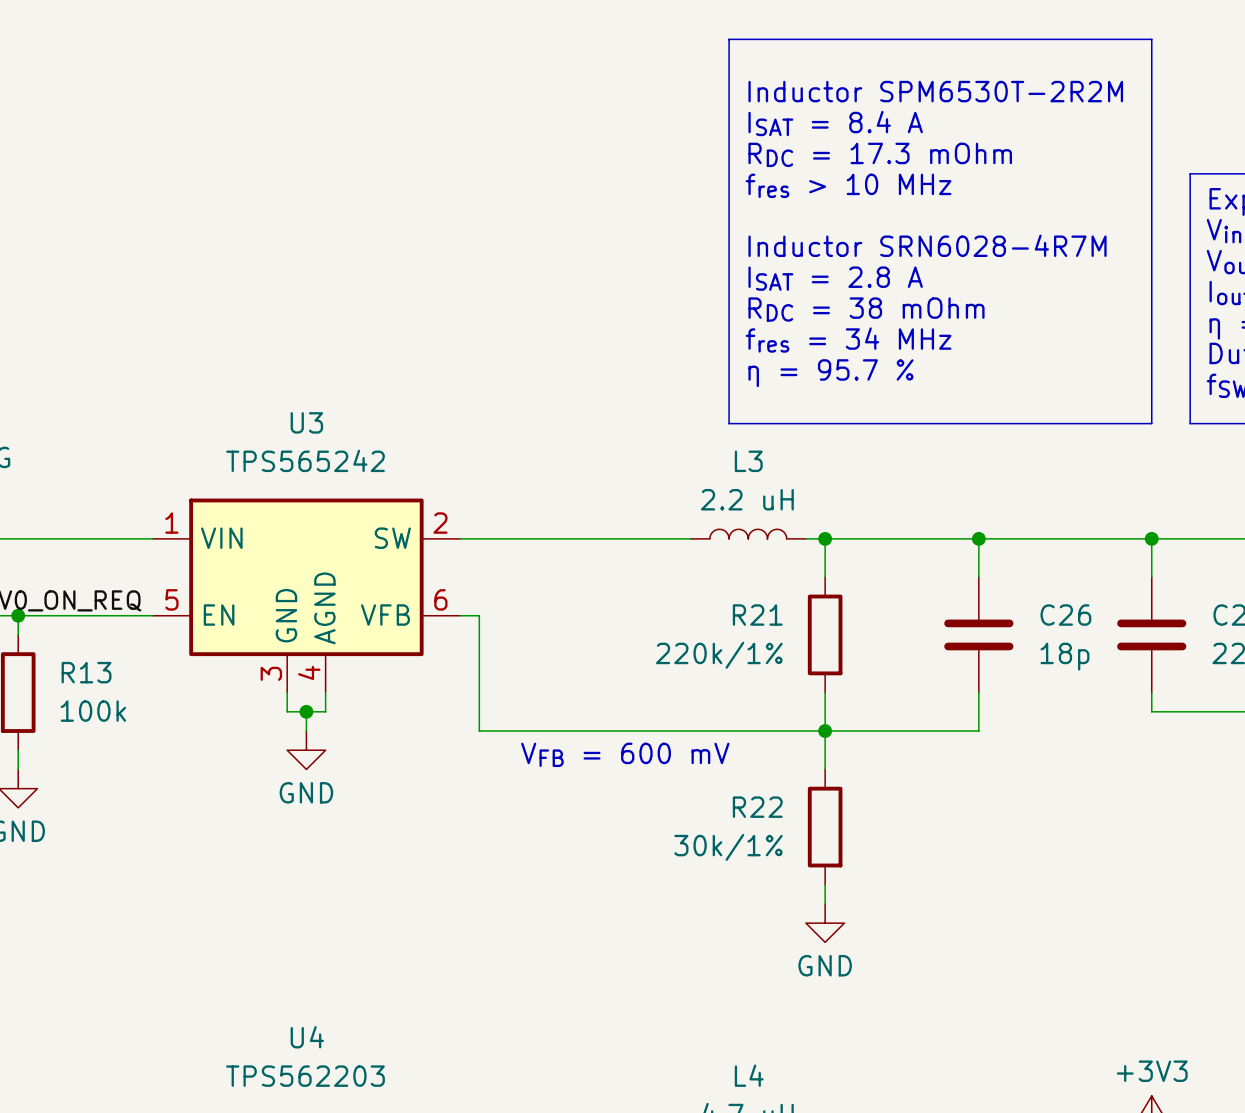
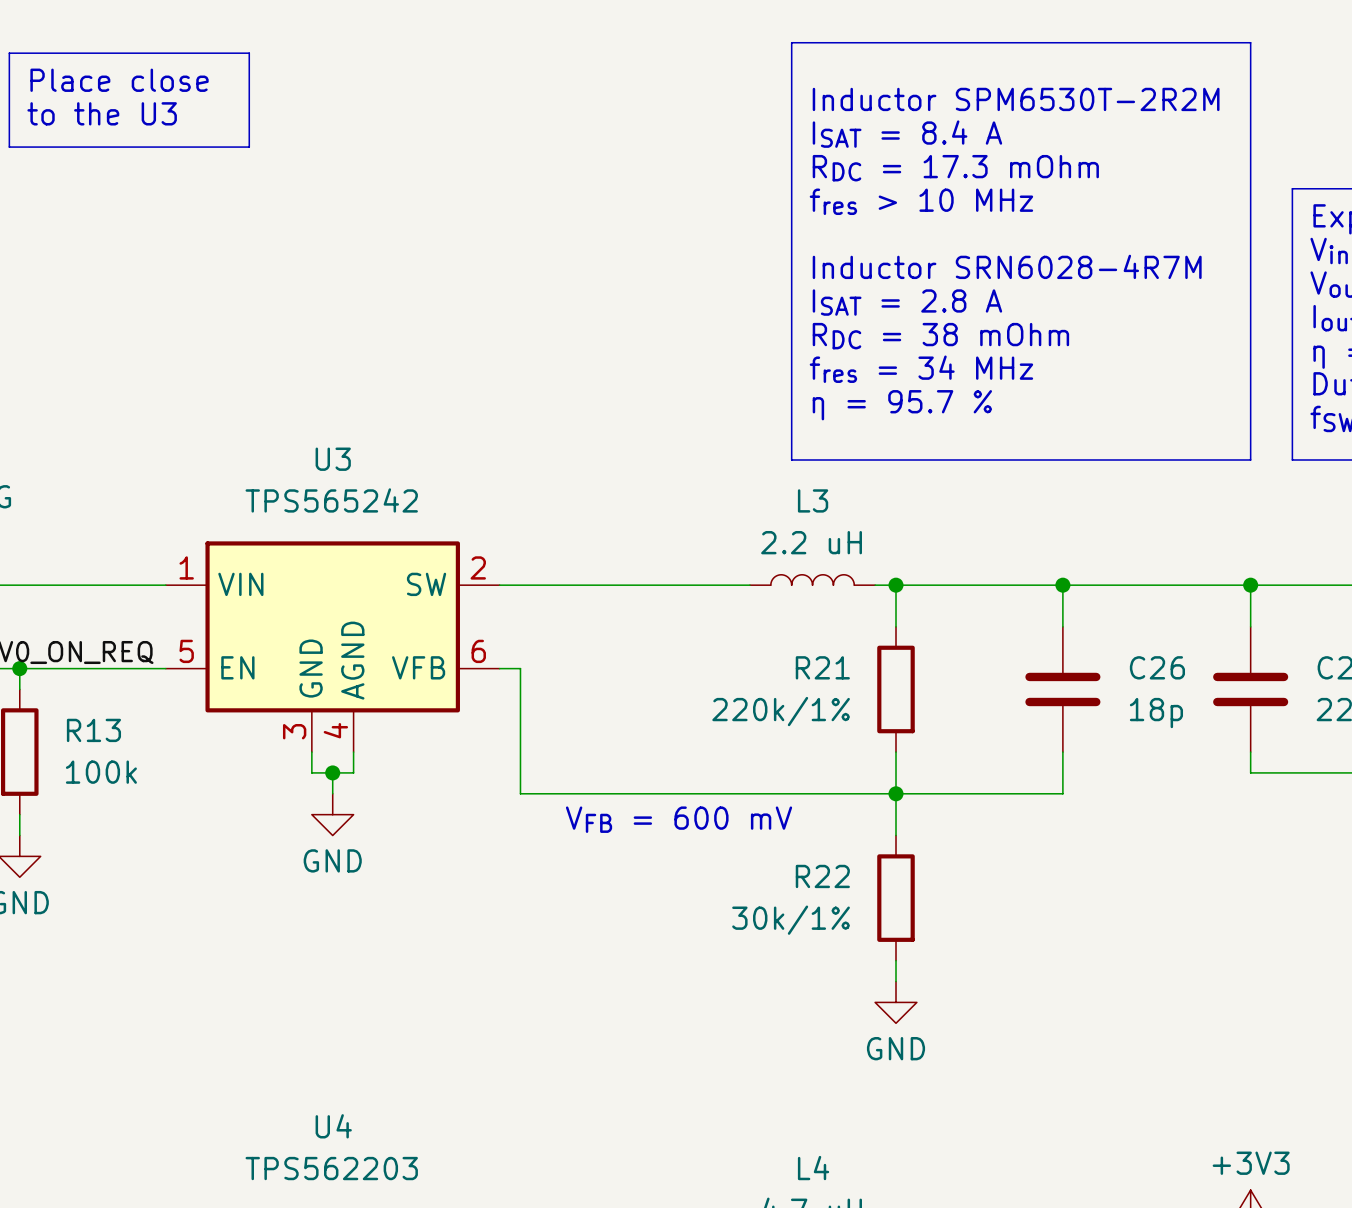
line: none -> (9, 53) (249, 53) (249, 147) (9, 147) (9, 53)
text: none -> Place close (119, 80)
text: none -> to the U3 (102, 113)

